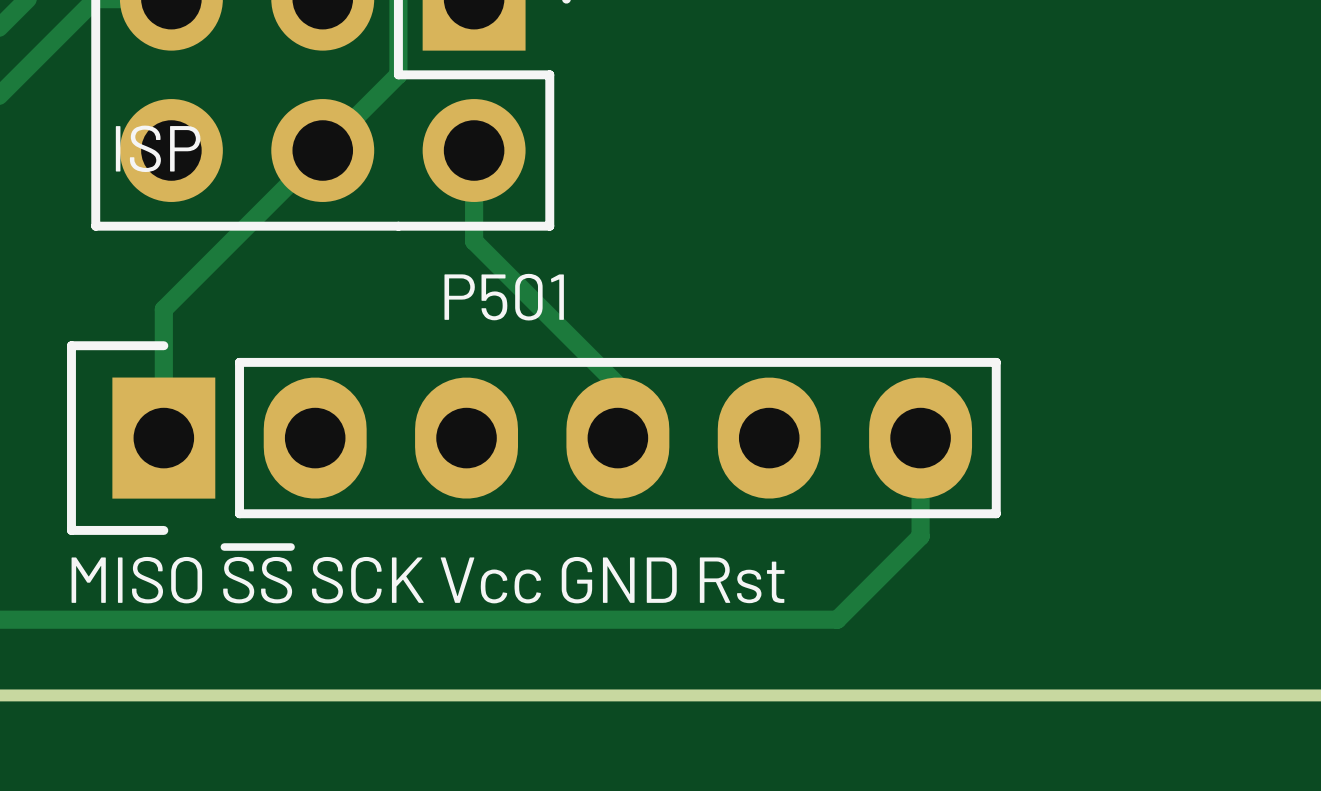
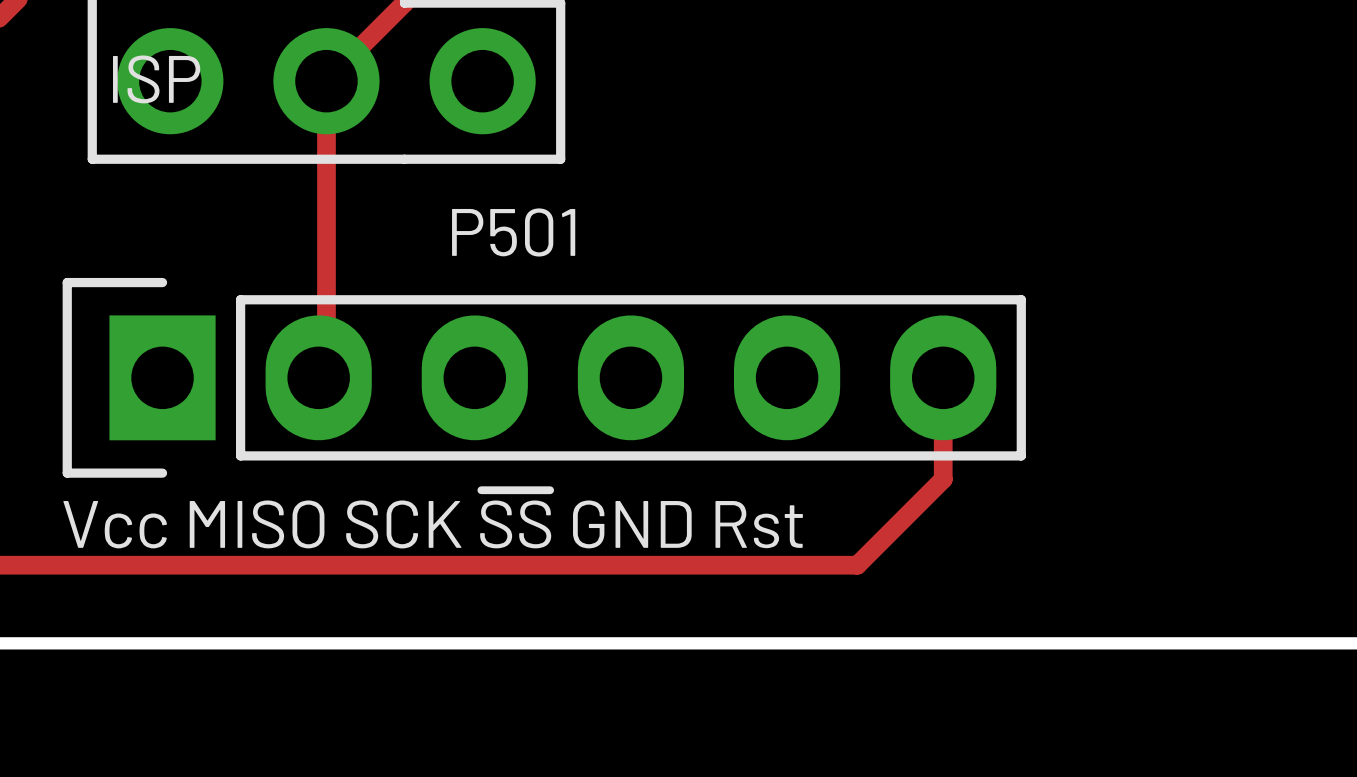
track: (322, 150) (163, 309) (163, 438) -> (326, 81) (326, 370)
track: (474, 150) (474, 241) (617, 385) (617, 438) -> none
text: MISO ~{SS} SCK Vcc GND Rst (428, 575) -> Vcc MISO SCK ~{SS} GND Rst (433, 519)

